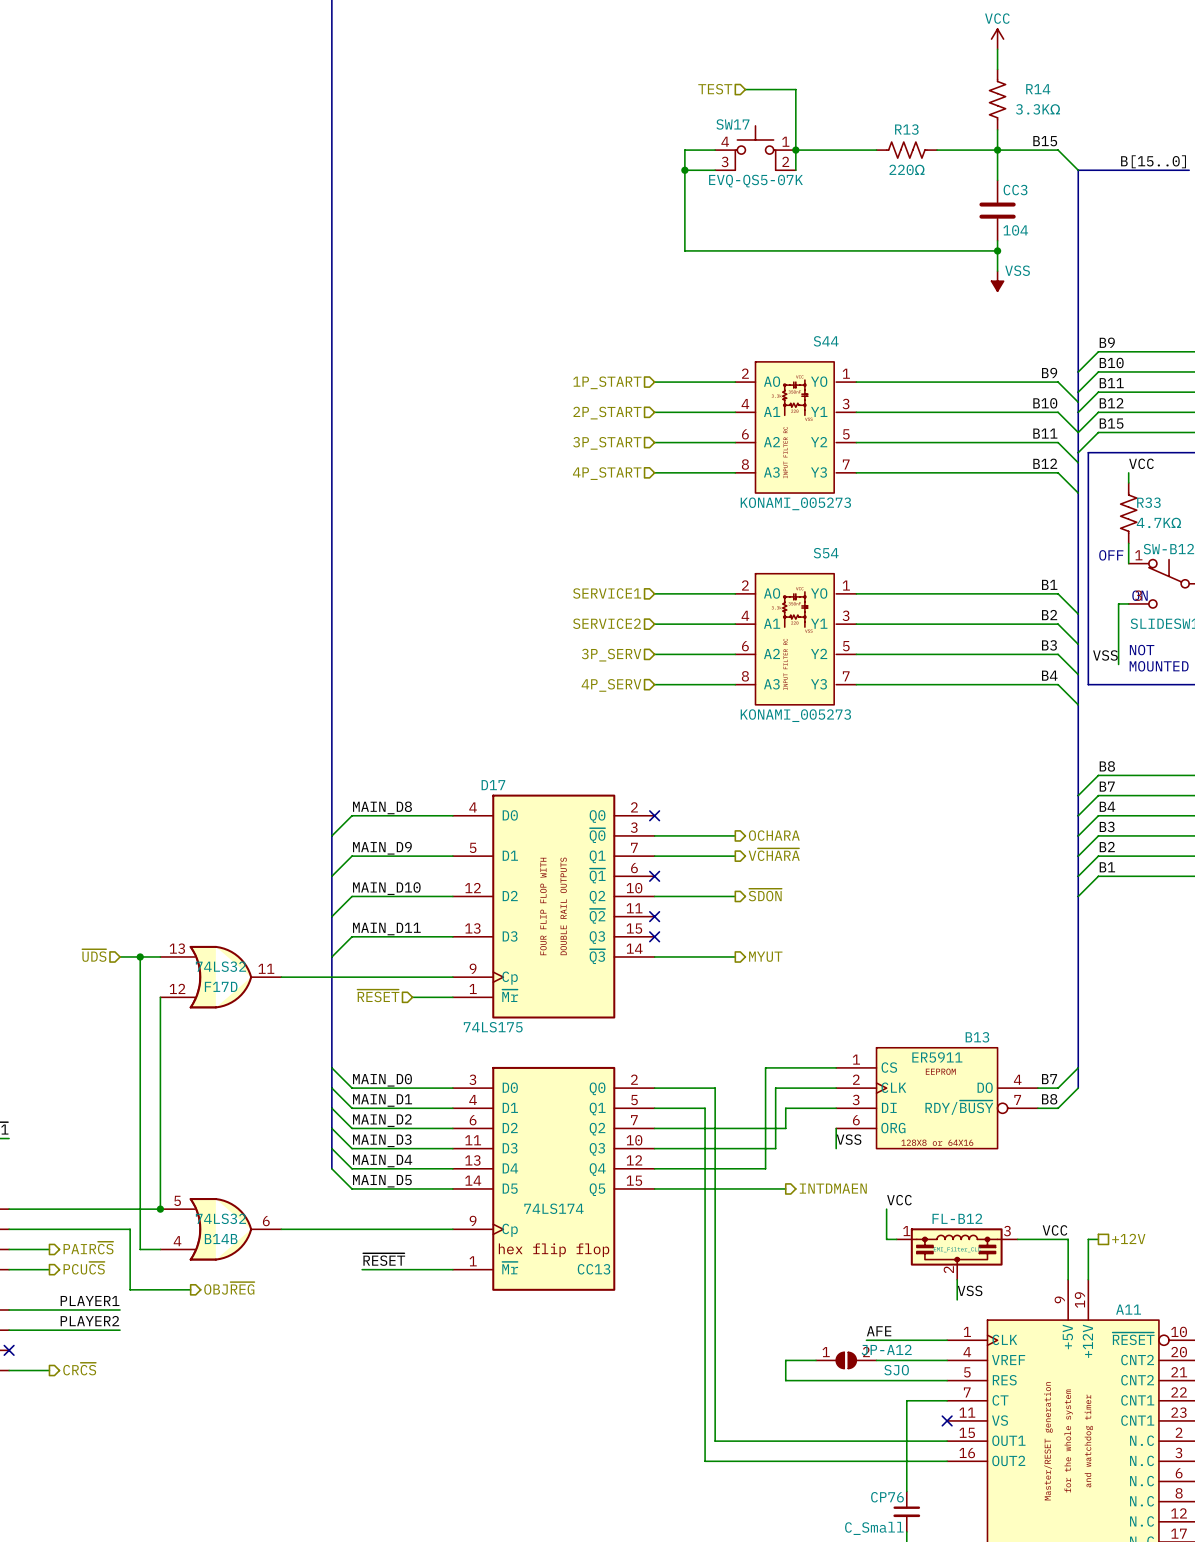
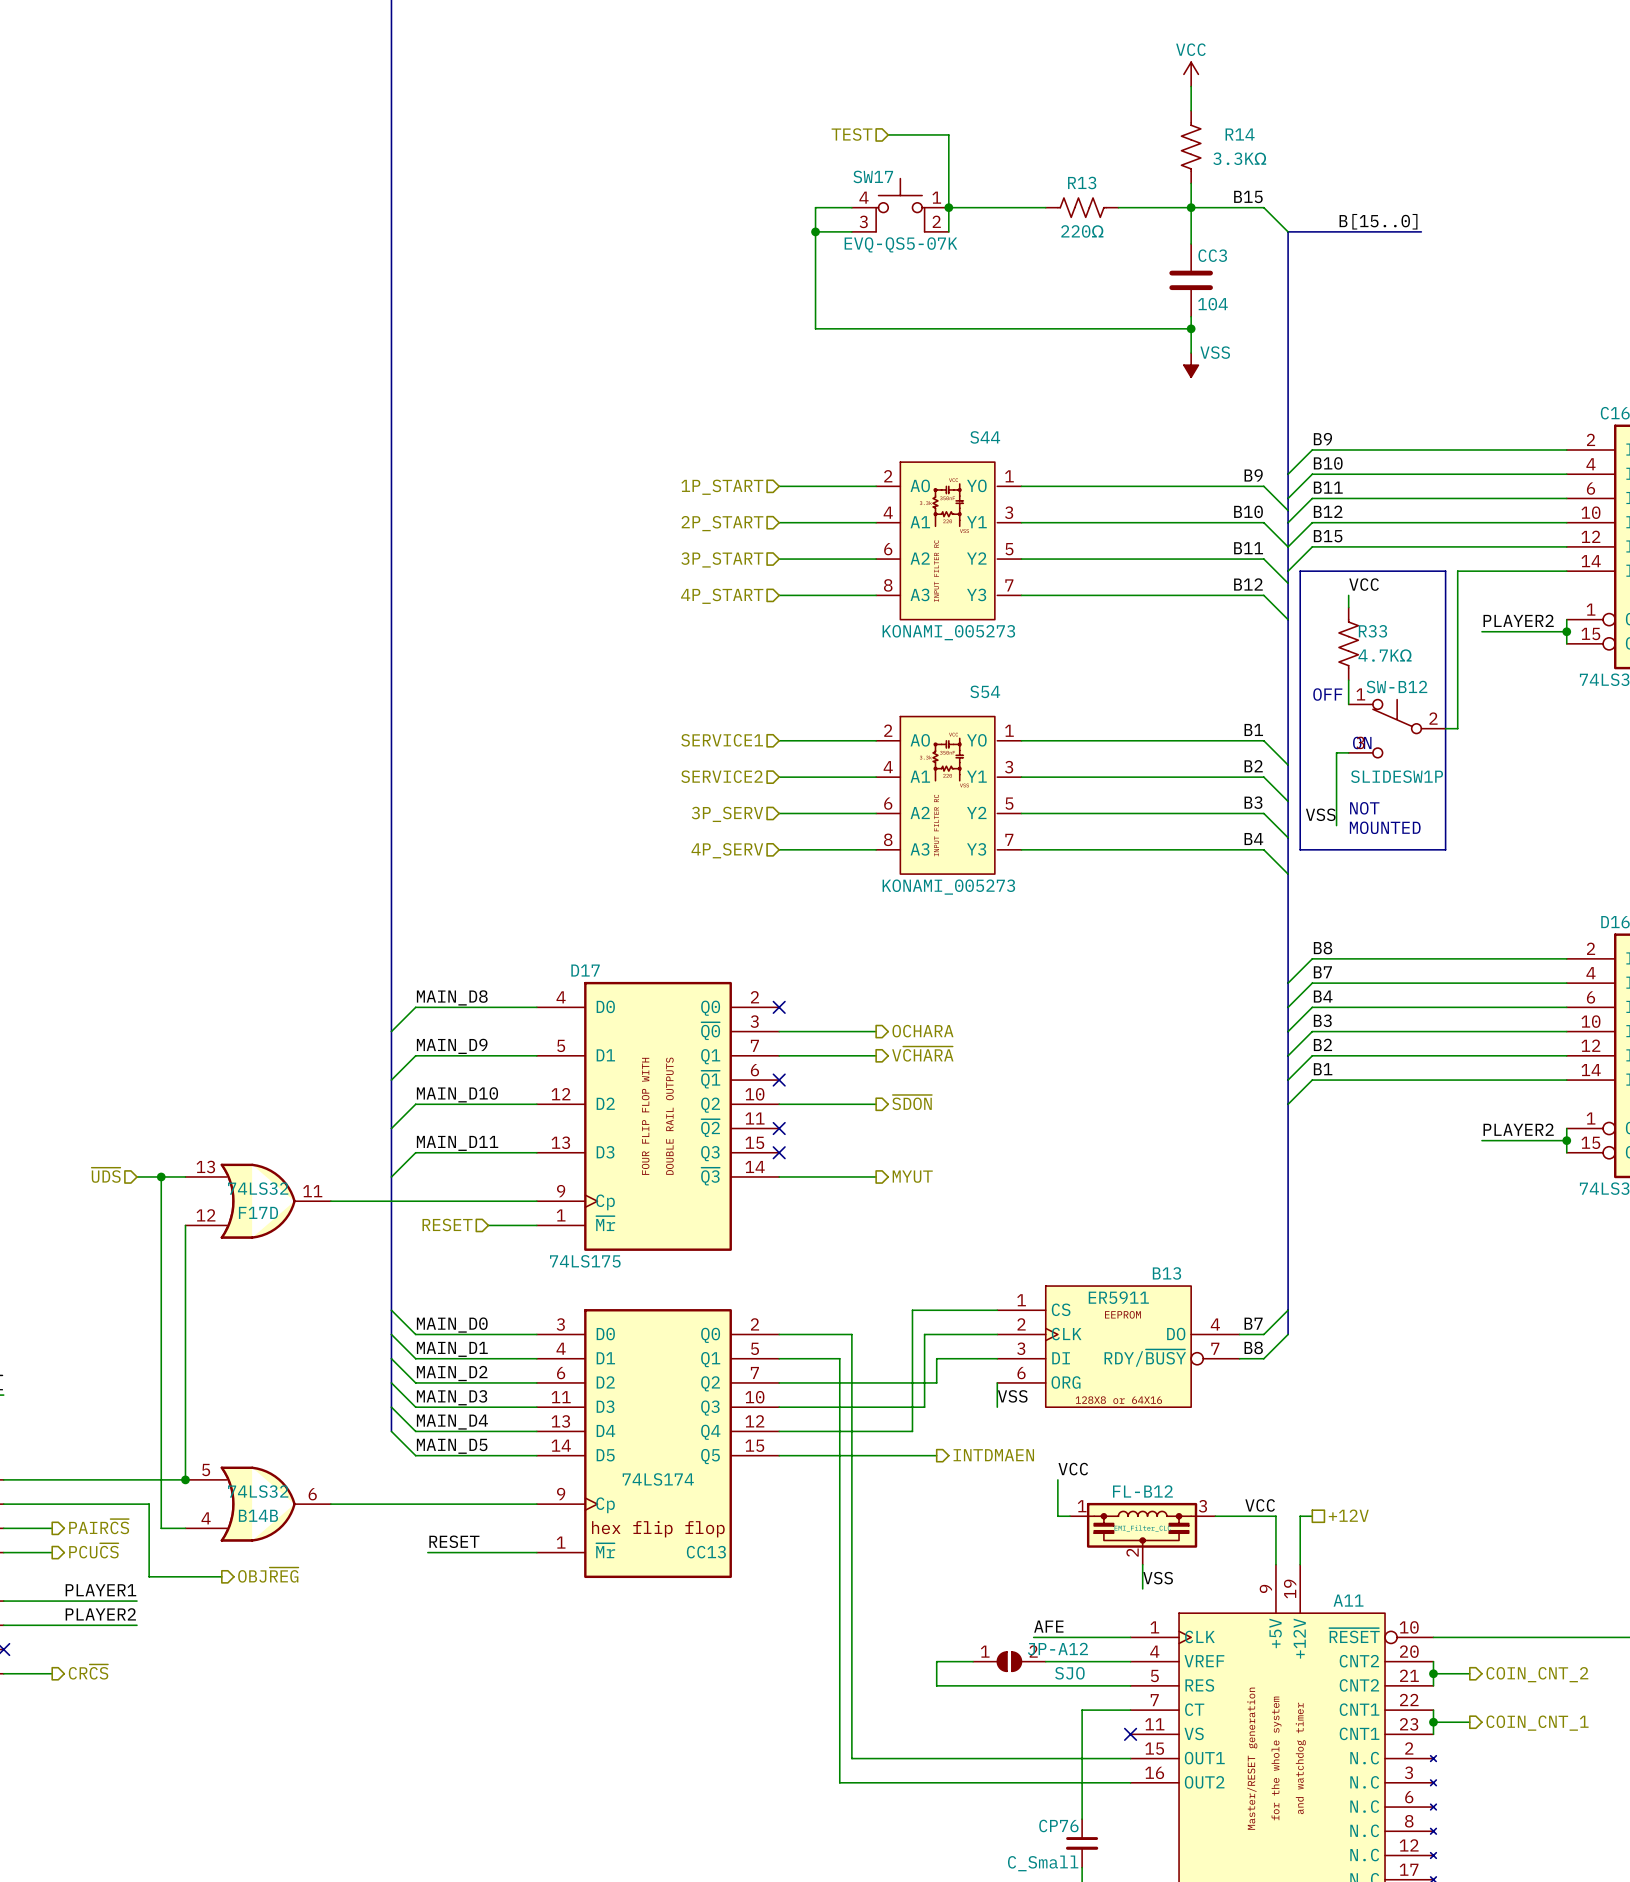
hierarchical label: ~{RESET} (378, 995) -> RESET (447, 1224)
label: ~{RESET} (384, 1259) -> RESET (454, 1541)

